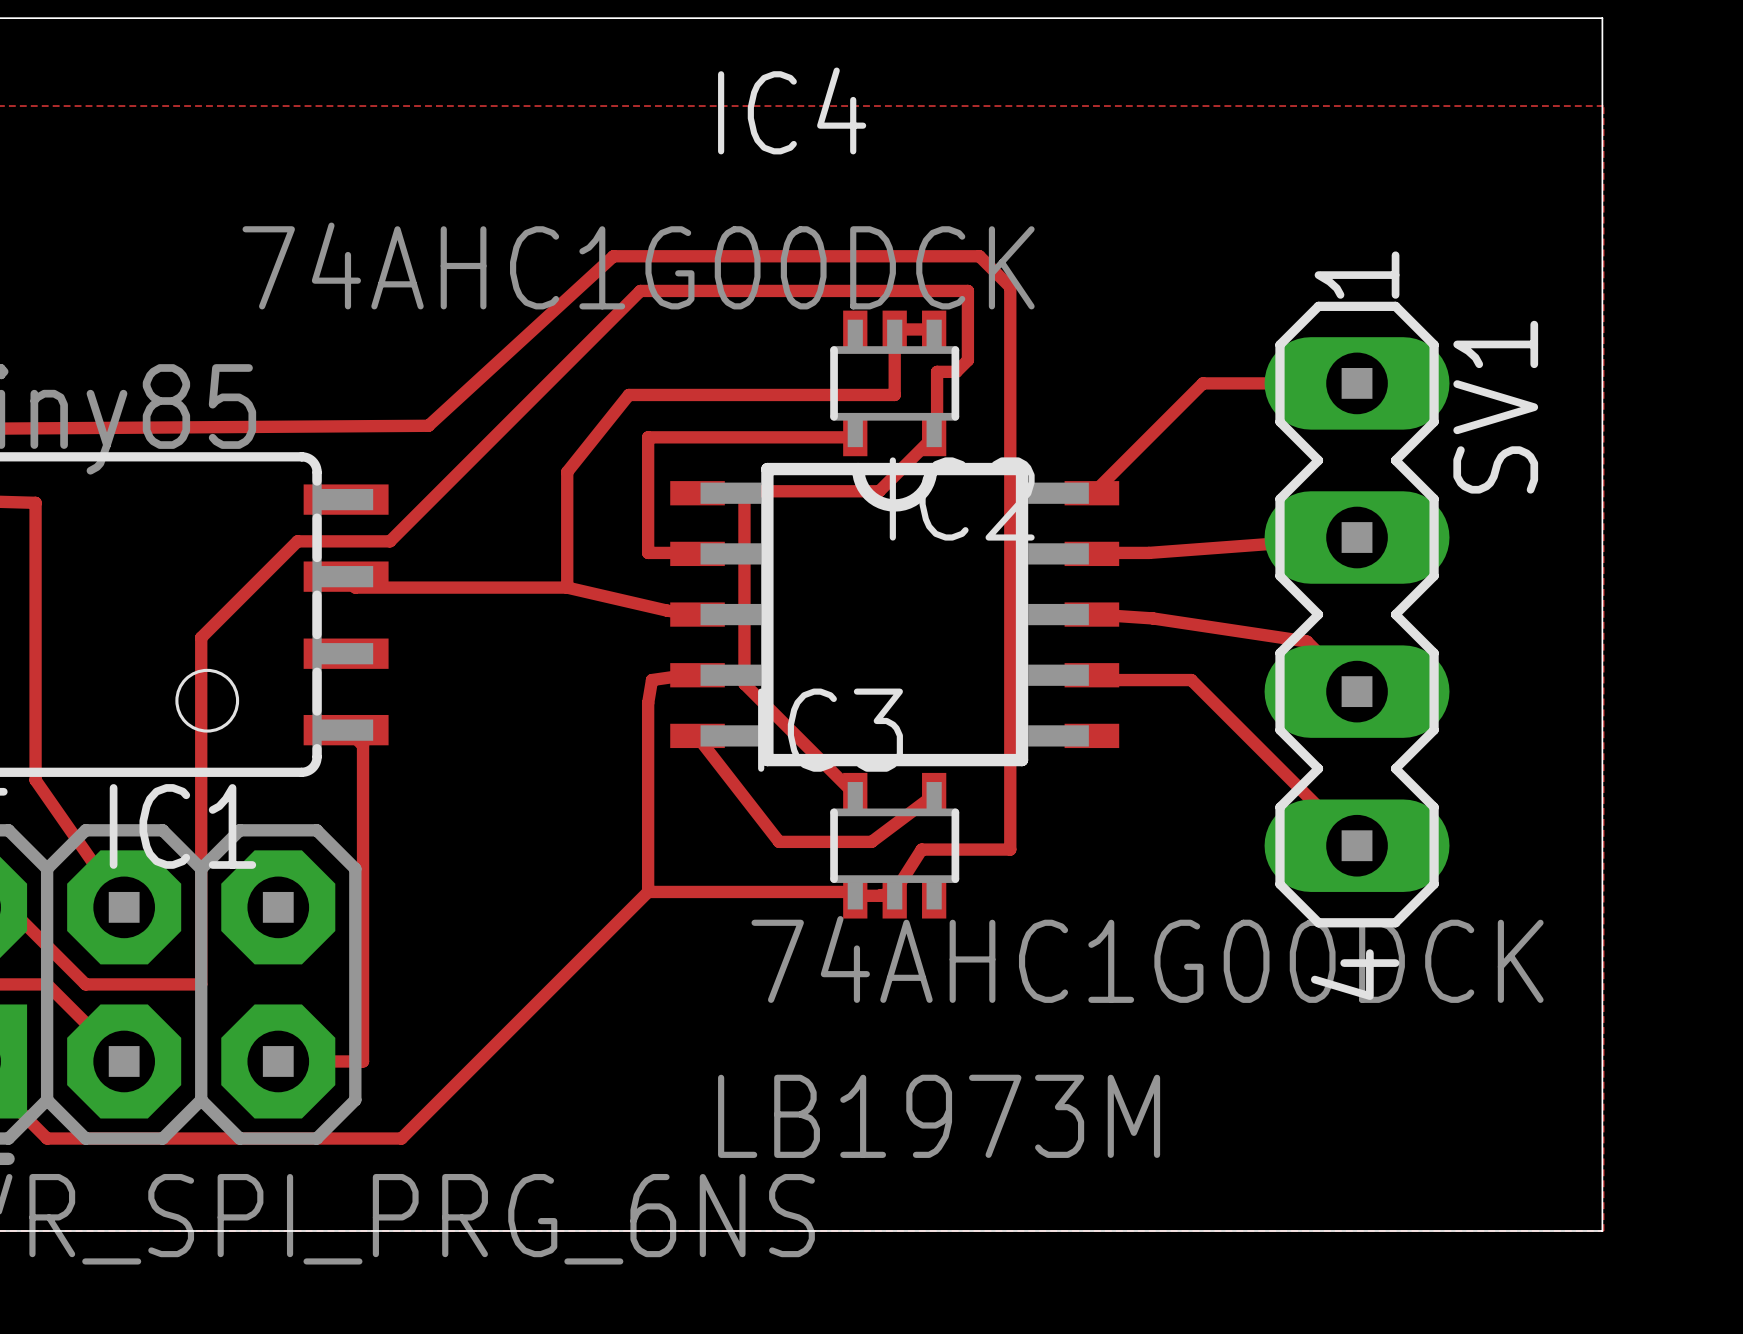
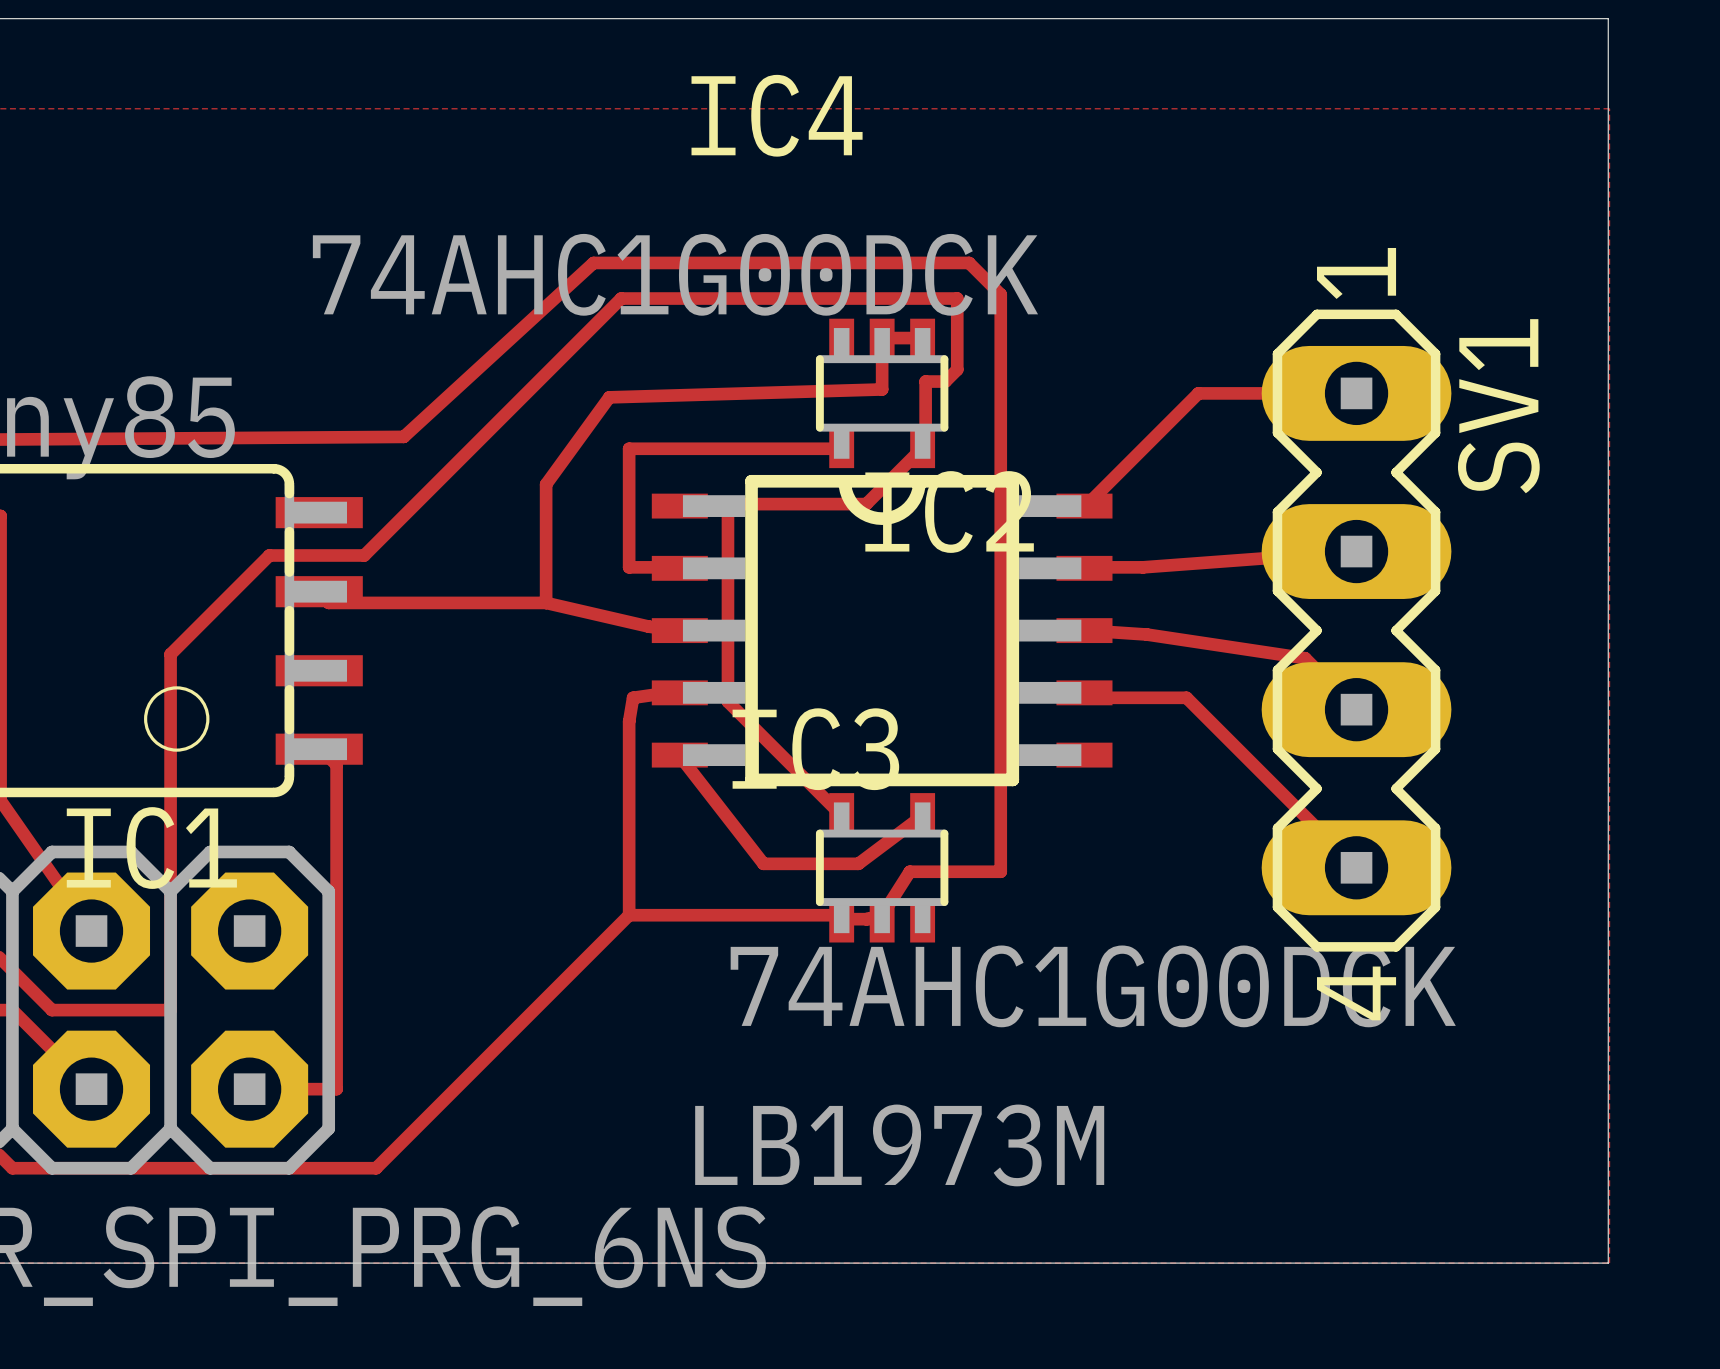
track: (894, 379) (894, 394) (628, 394) (567, 472) -> (882, 389) (609, 397) (546, 484)

